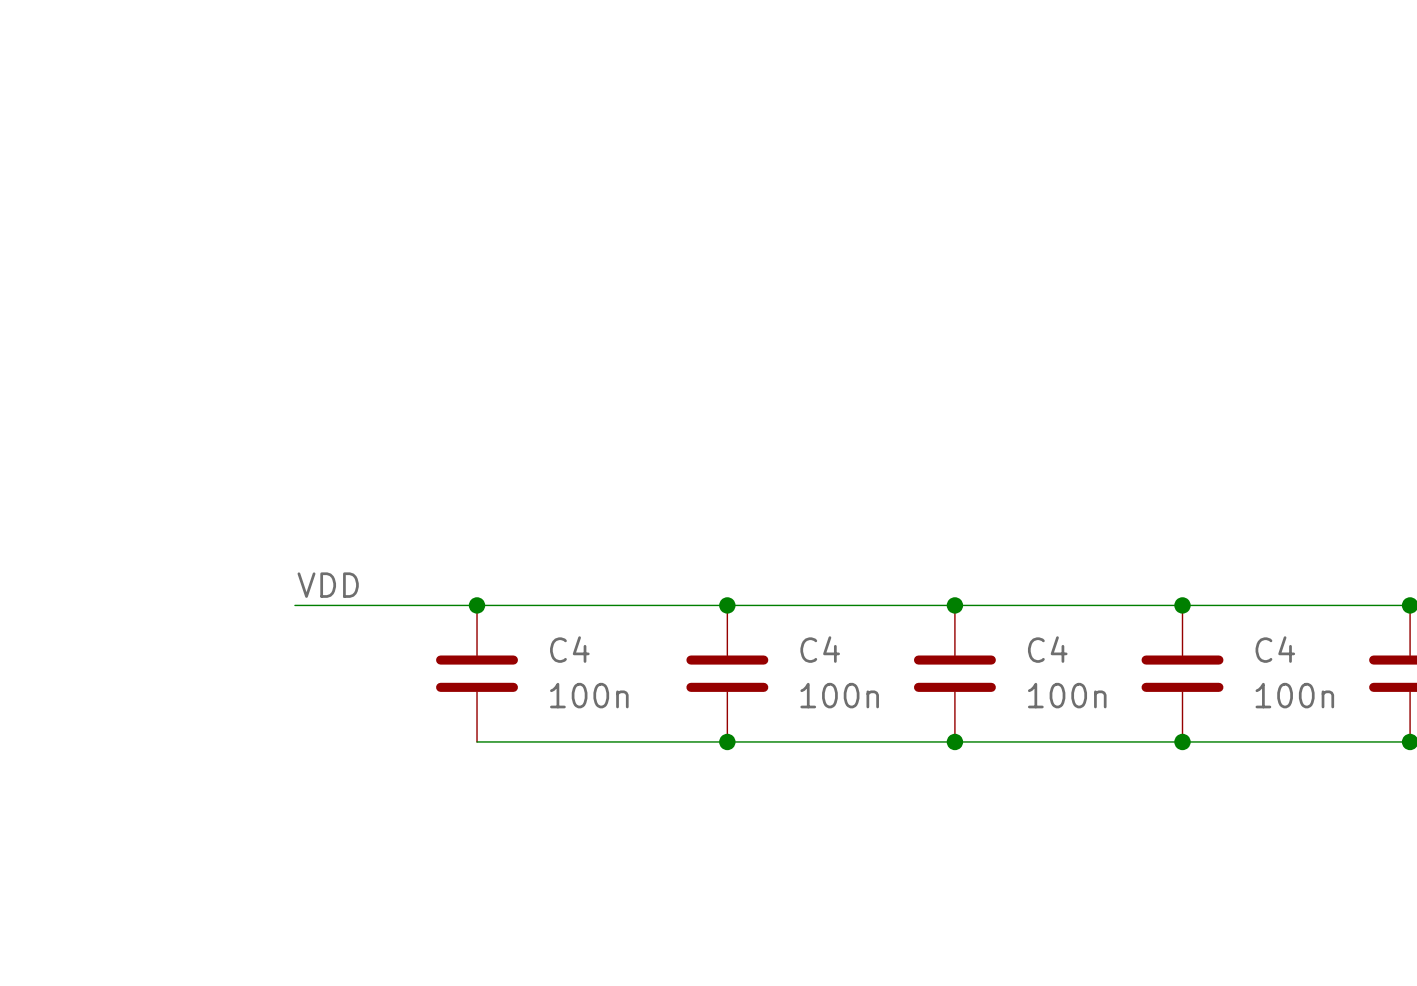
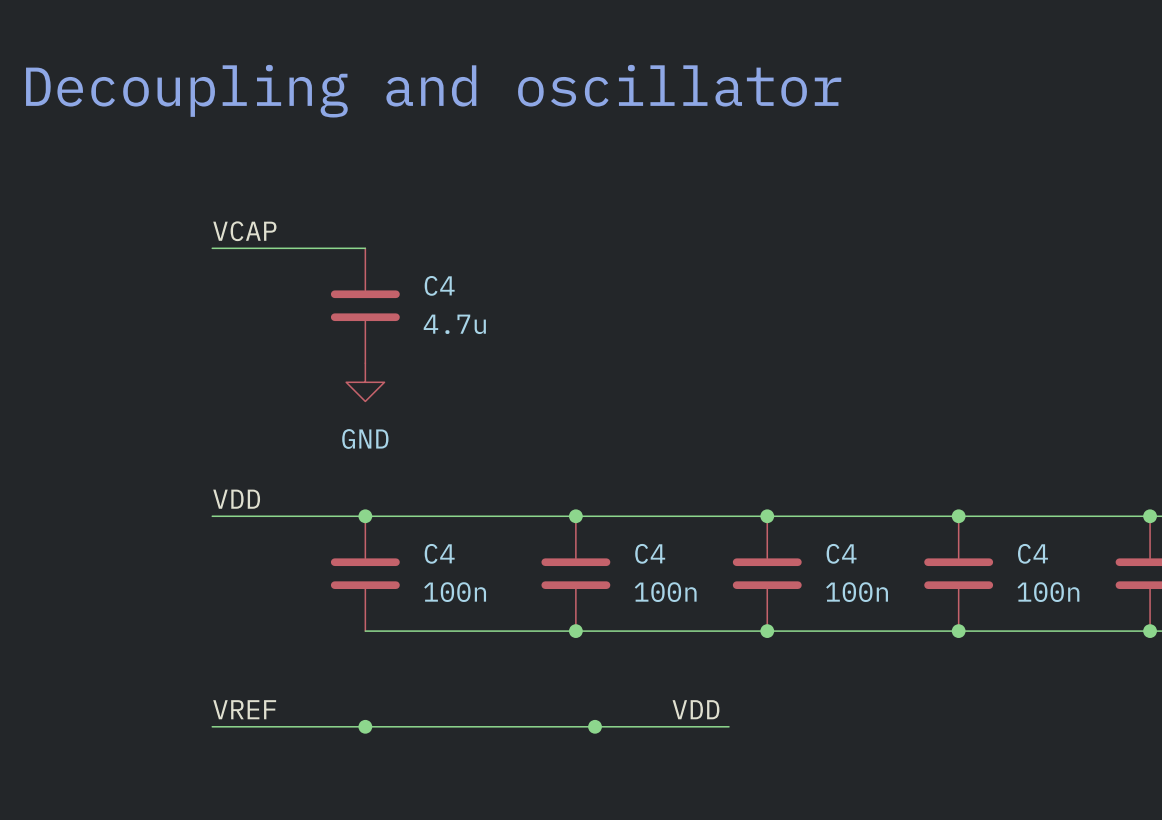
text: none -> Decoupling and oscillator (433, 91)
label: none -> VCAP (244, 231)
wire: none -> (212, 248) (365, 248)
C4: none -> 4.7u (365, 305)
power symbol: none -> GND (365, 382)
label: none -> VREF (244, 709)
label: none -> VDD (695, 709)
wire: none -> (212, 726) (728, 726)
junction: none -> (365, 726)
junction: none -> (595, 726)

